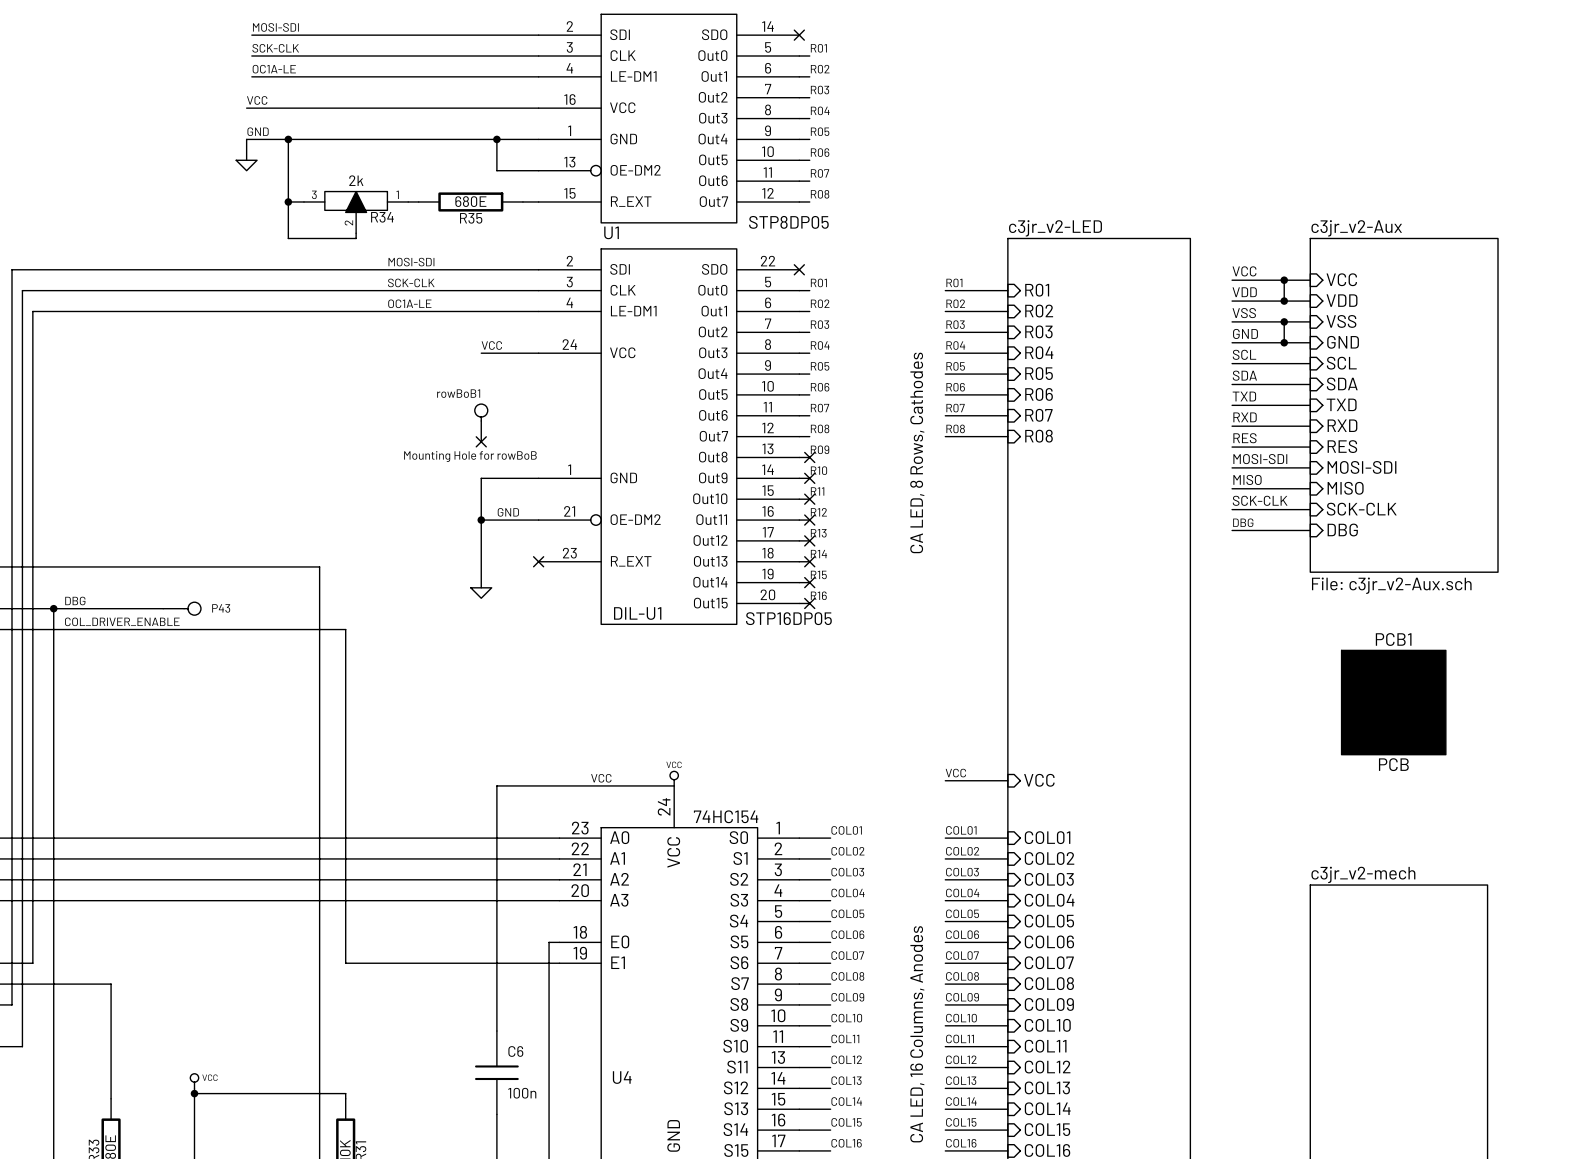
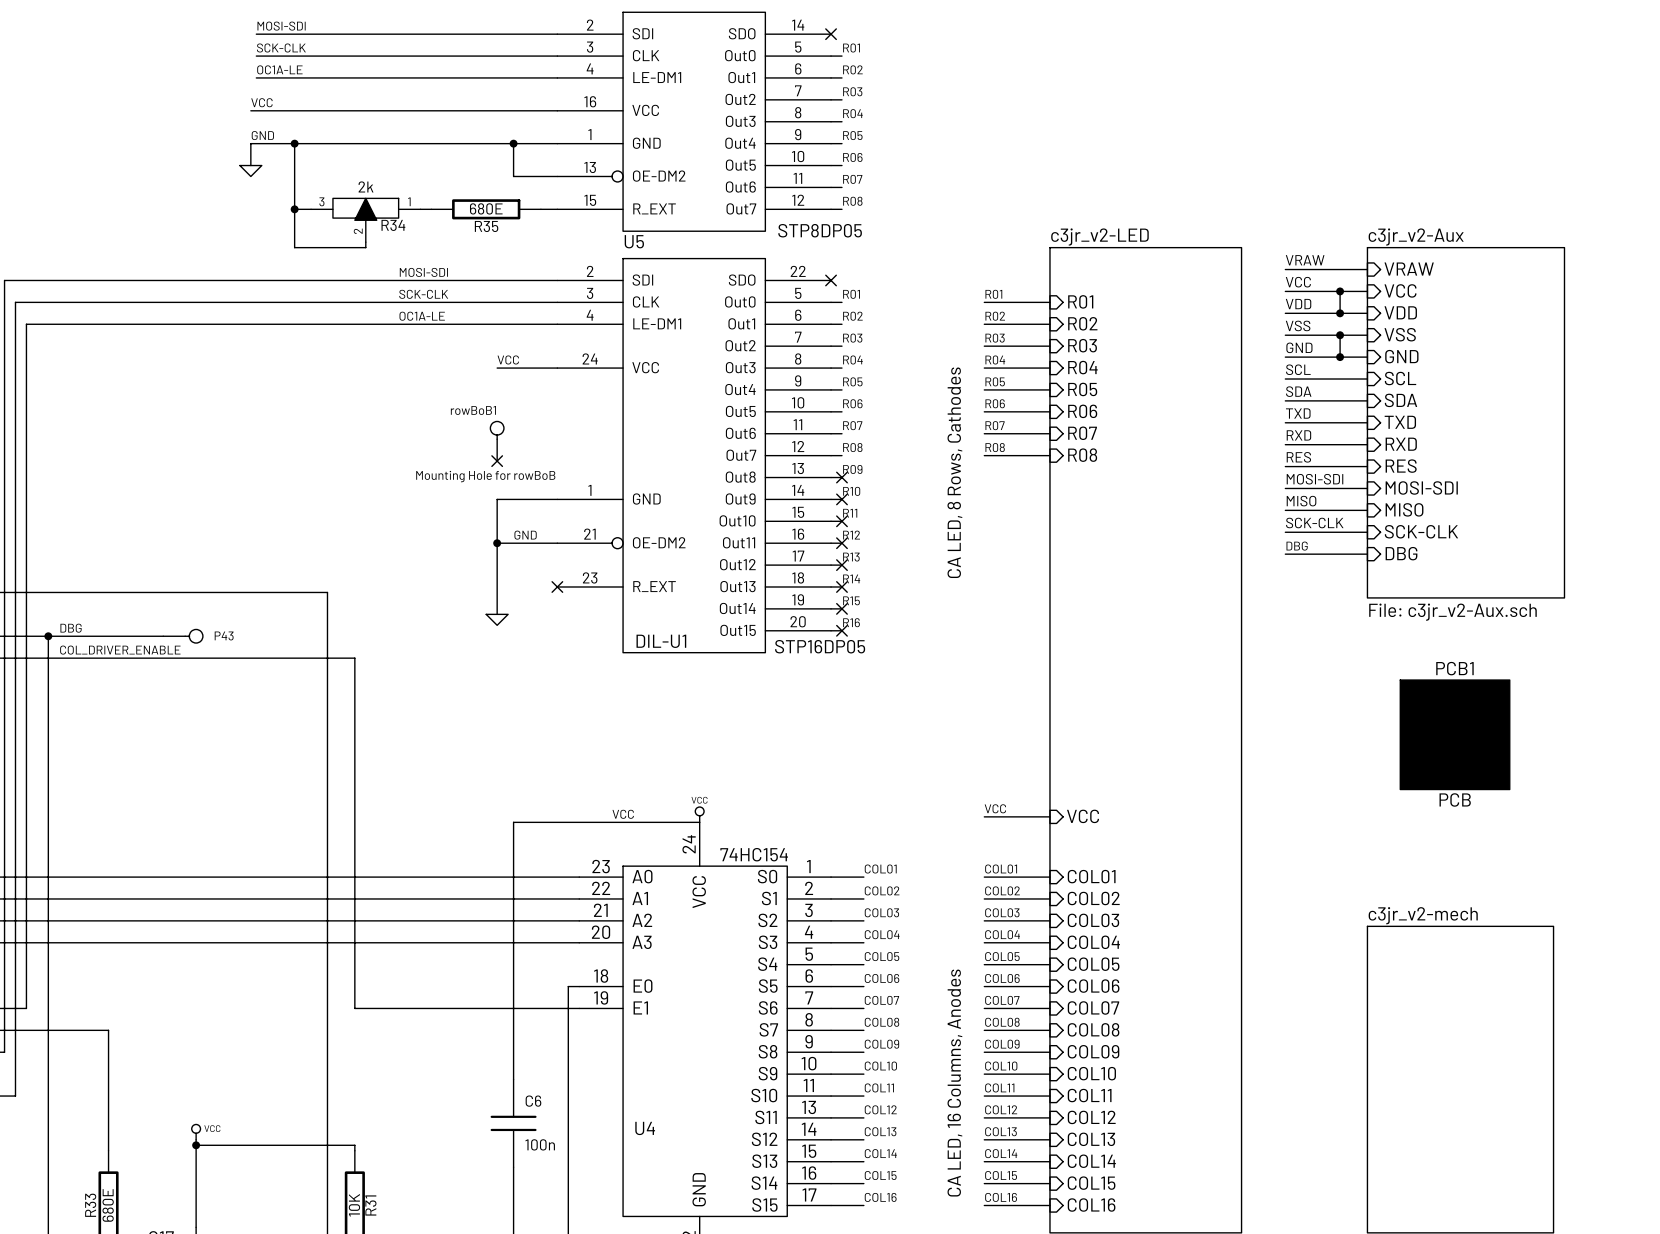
U1 name: U1 (611, 232) -> U5 (634, 241)
label: none -> VRAW (1305, 260)
sheet pin: none -> VRAW (1409, 269)
wire: none -> (1285, 269) (1367, 269)

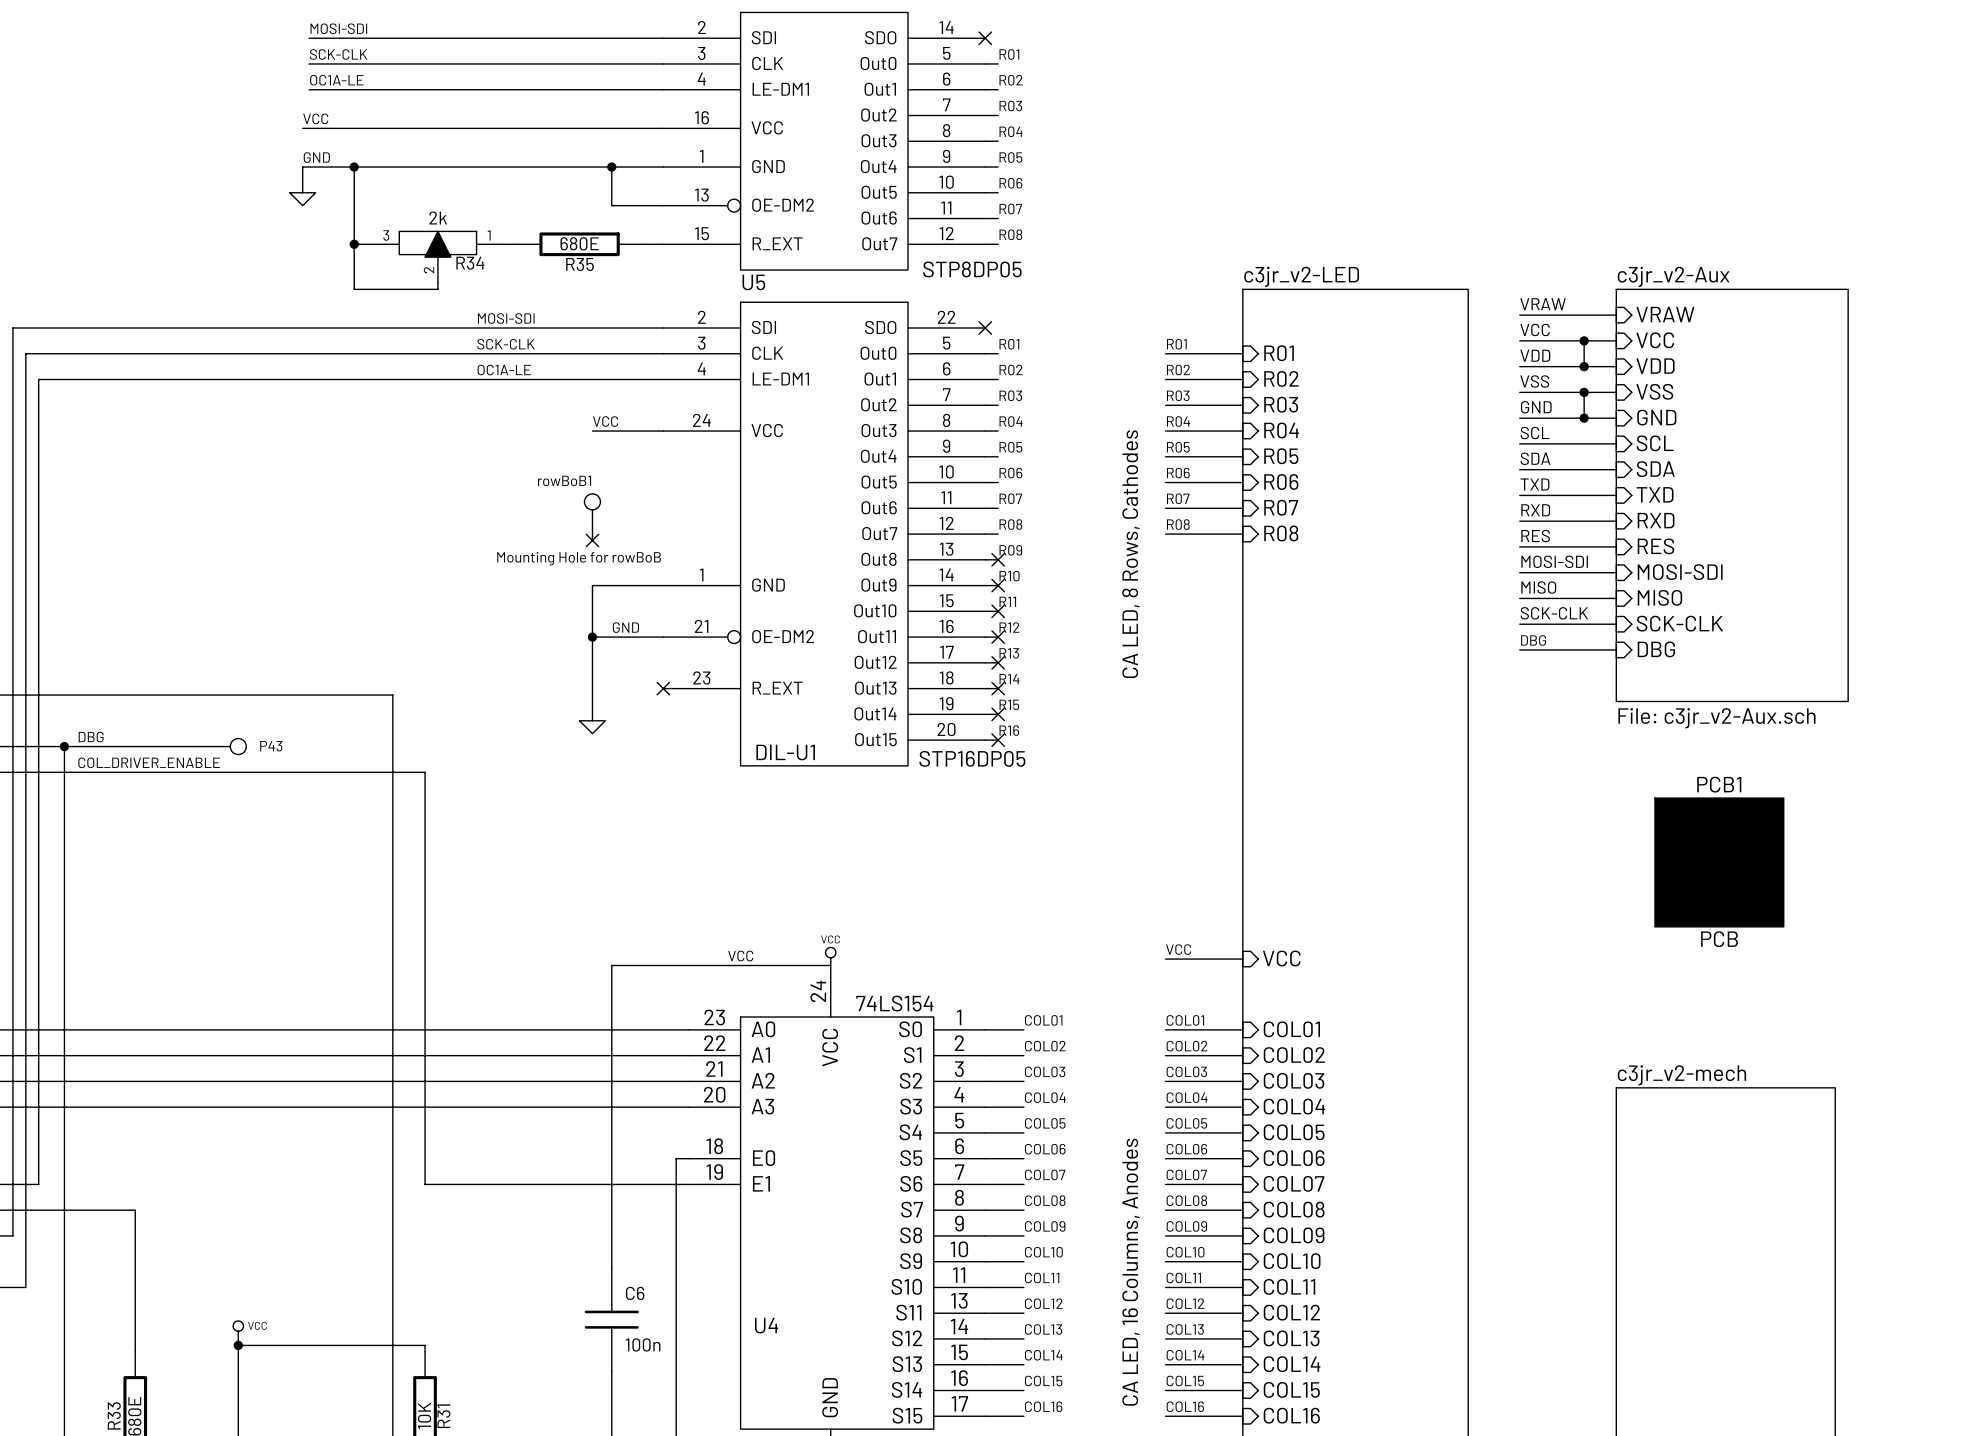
U4 value: 74HC154 (754, 854) -> 74LS154 (894, 1003)

